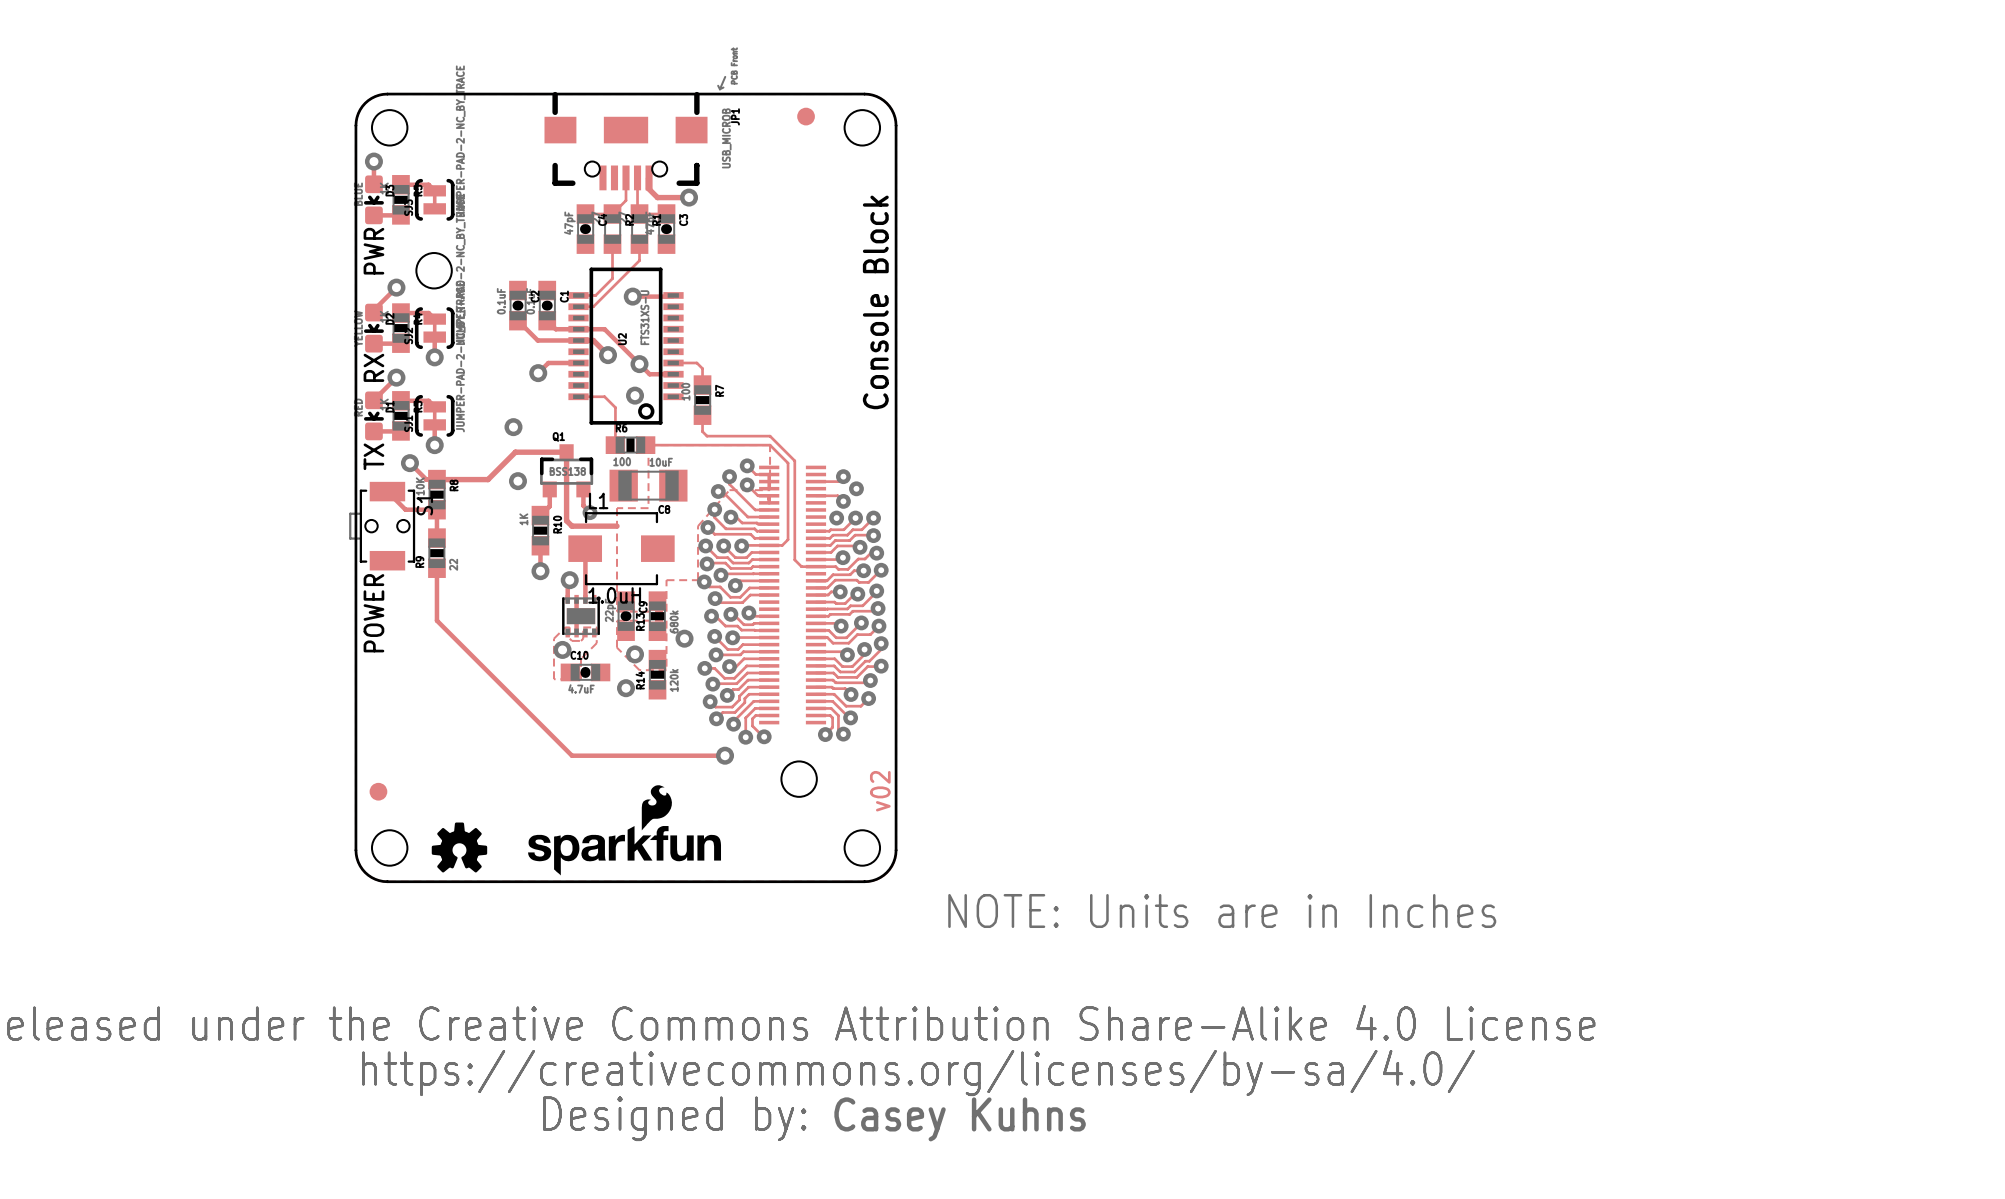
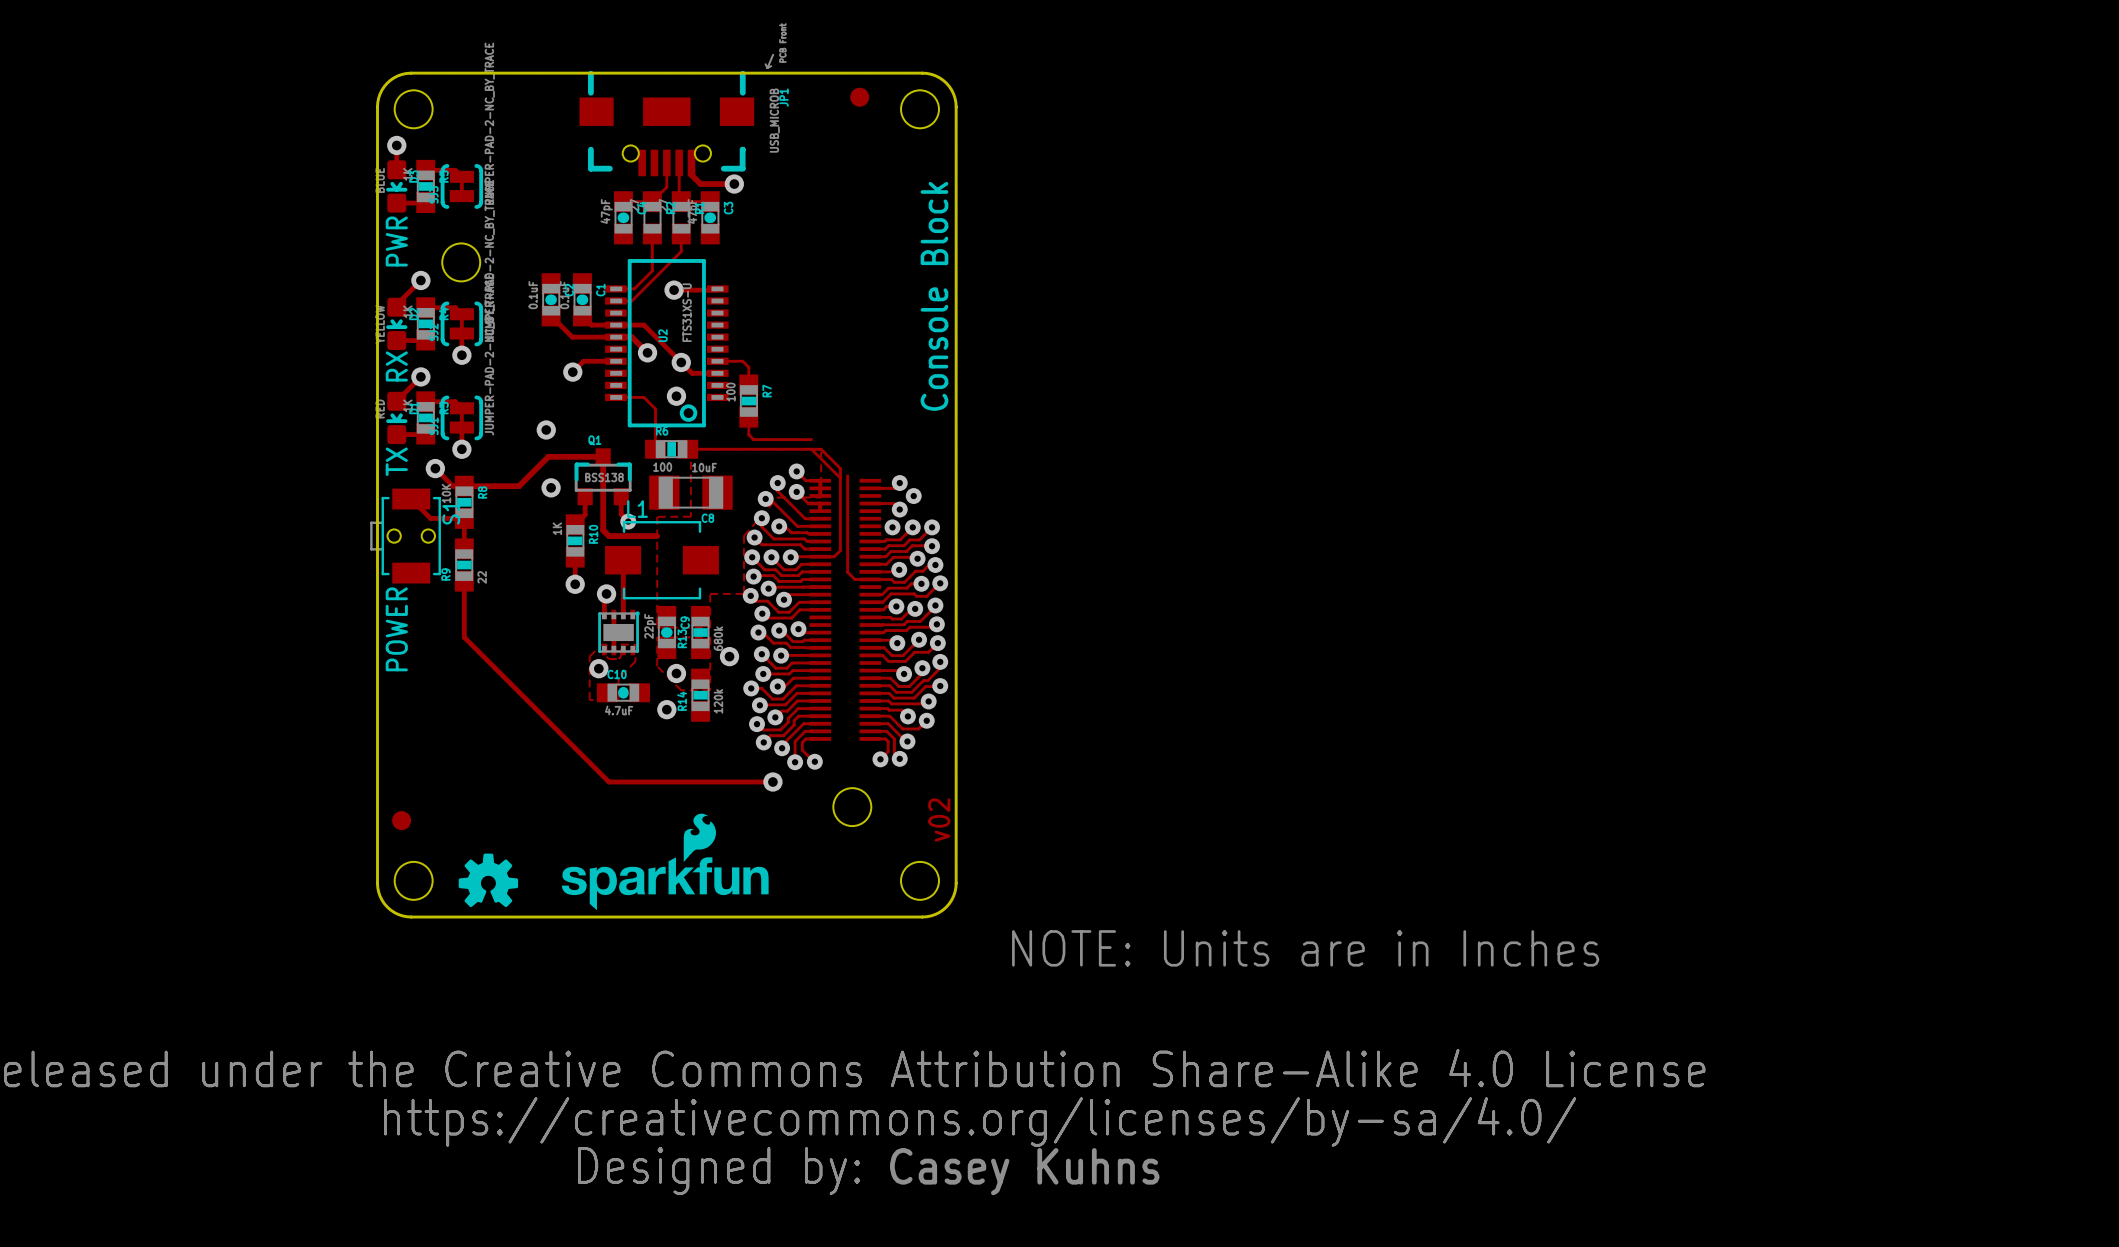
track: (761, 436) (770, 436) (794, 460) (794, 469) -> none
track: none -> (811, 449) (840, 478)
part footprint: [759, 465, 827, 725] -> [809, 478, 882, 741]
L1 value: 1.0uH (614, 595) -> none

